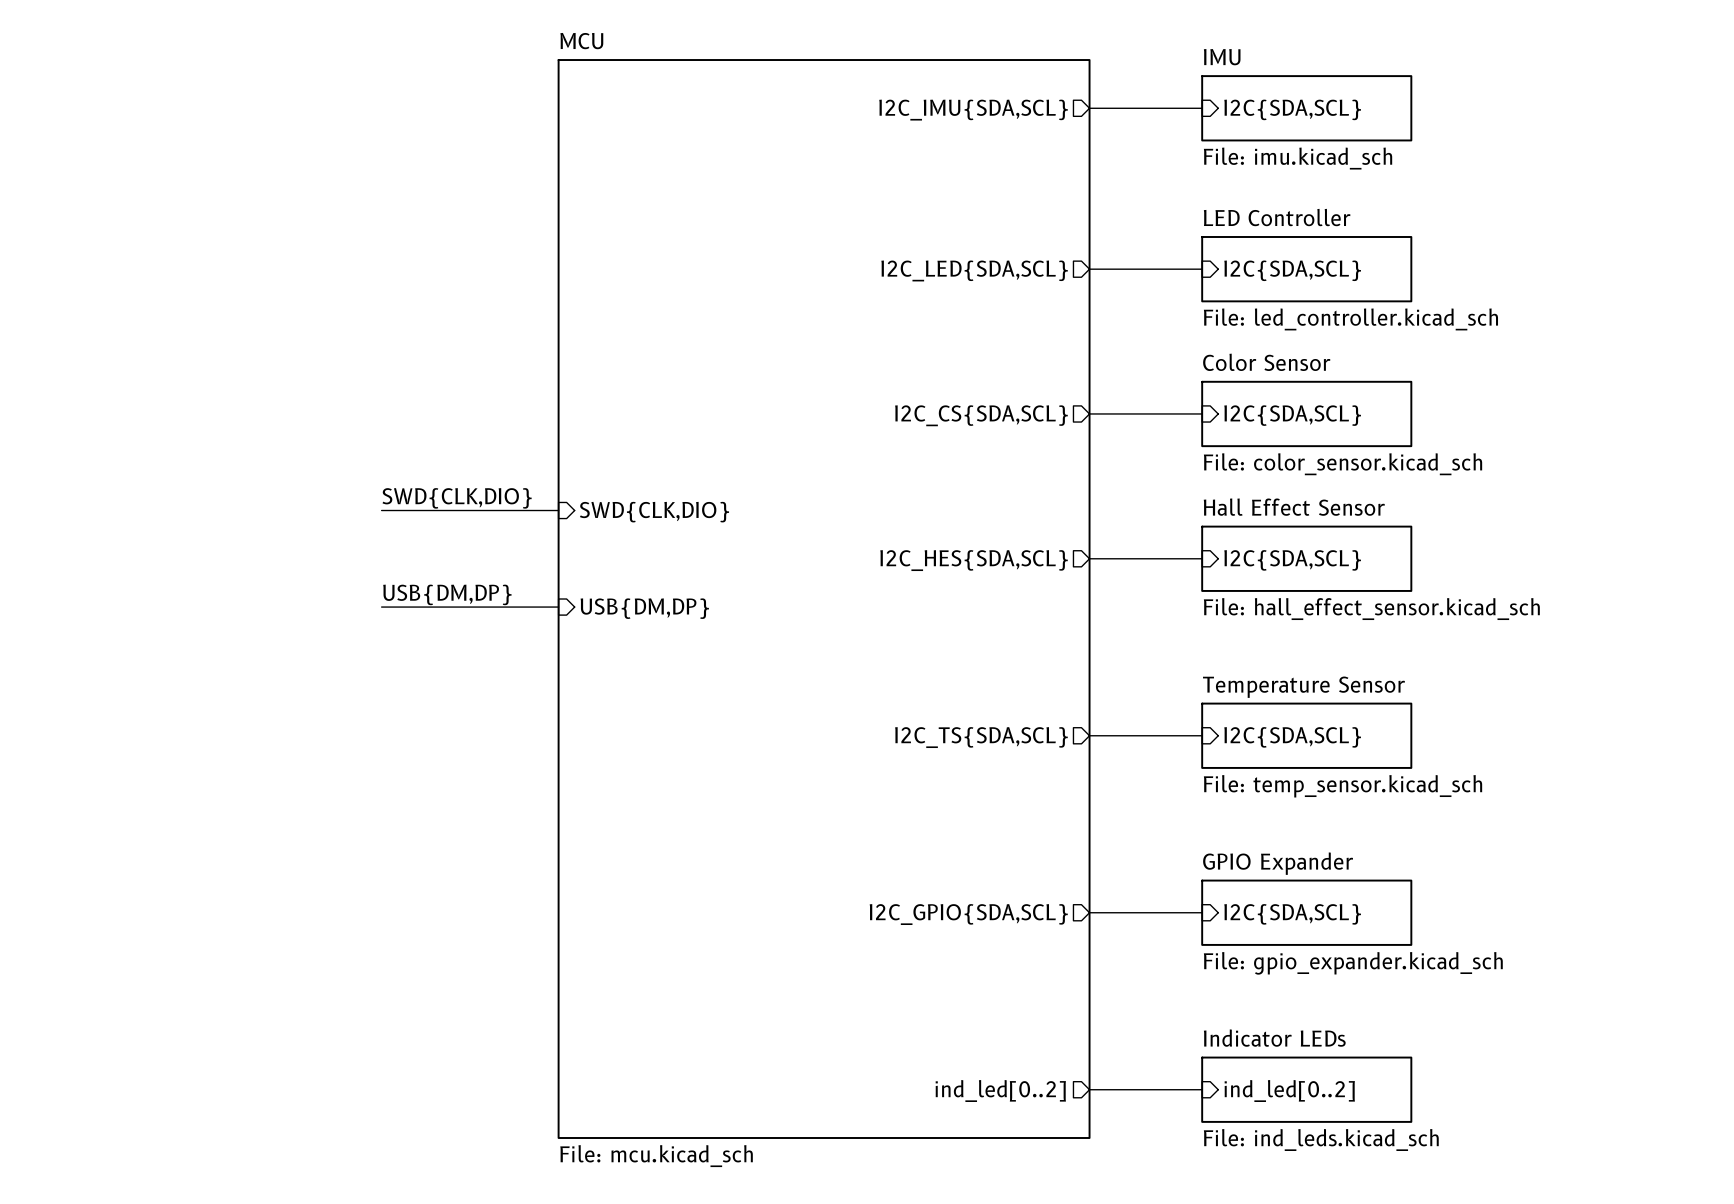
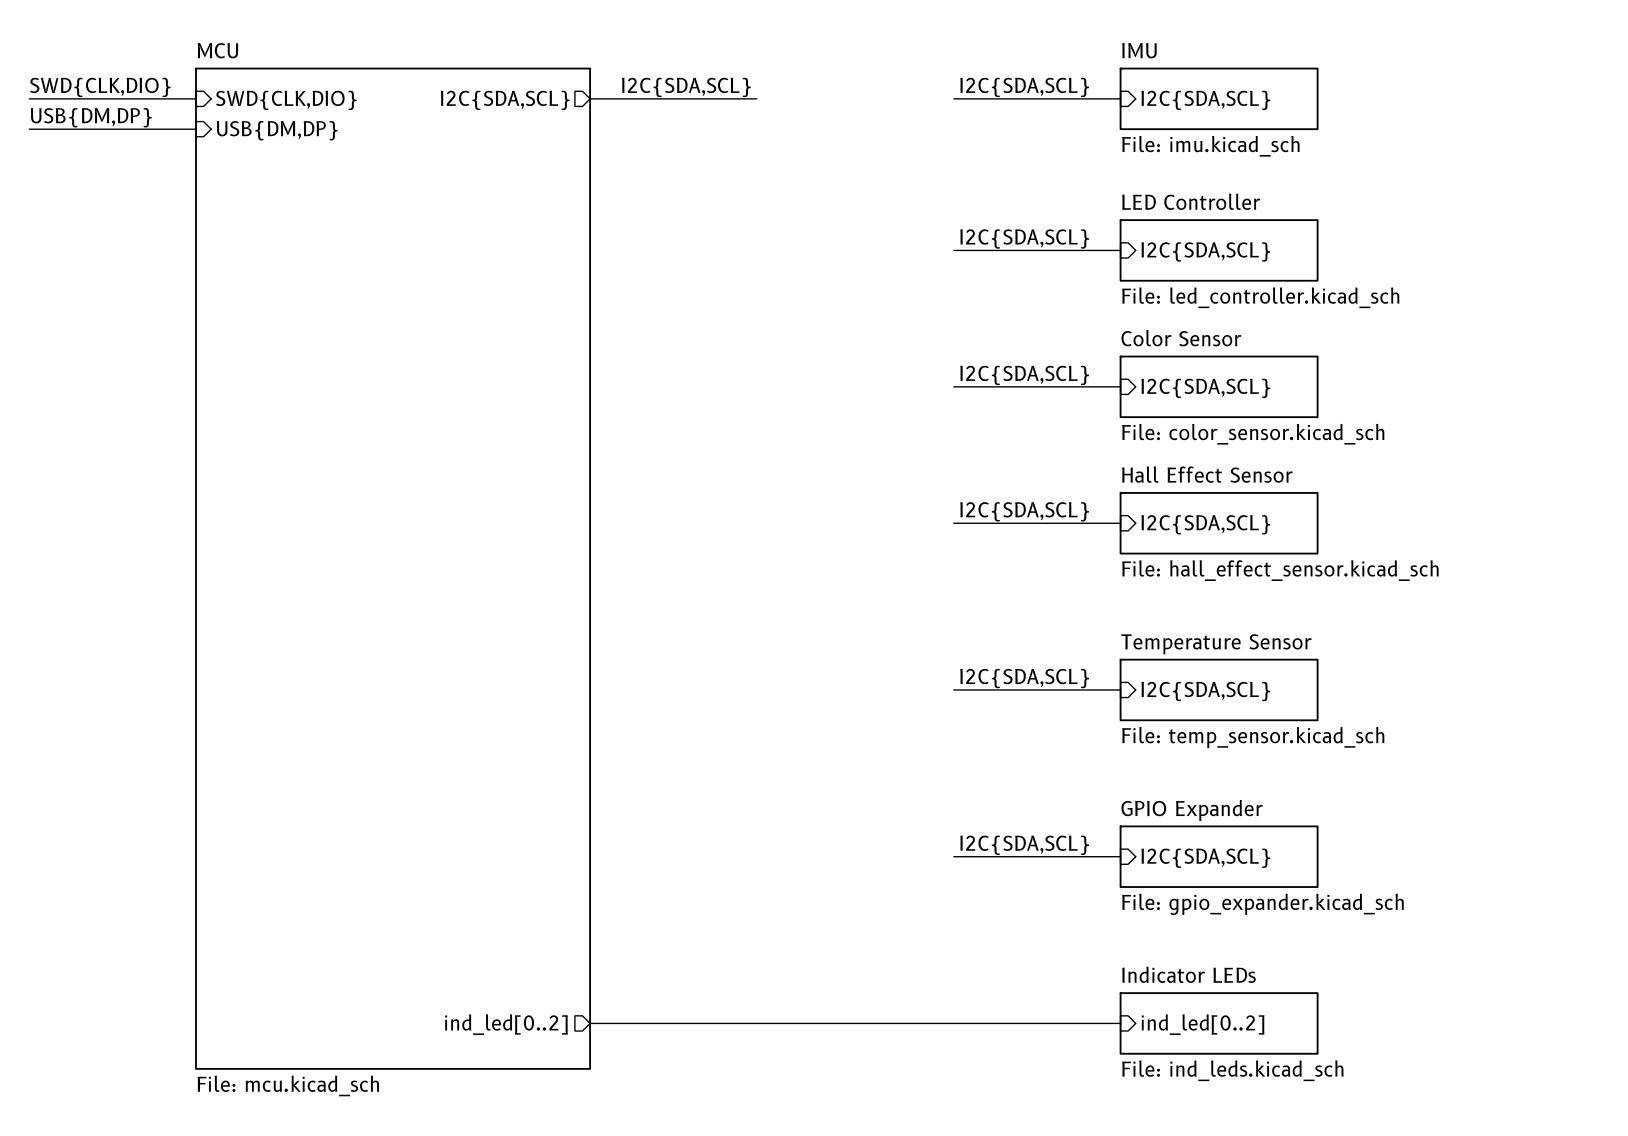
label: none -> SWD{CLK,DIO} (100, 87)
label: none -> I2C{SDA,SCL} (686, 87)
label: none -> I2C{SDA,SCL} (1024, 87)
bus: none -> (29, 98) (196, 98)
bus: none -> (590, 98) (756, 98)
bus: none -> (953, 98) (1014, 98)
sheet pin: none -> SWD{CLK,DIO} (286, 100)
sheet pin: none -> I2C{SDA,SCL} (505, 100)
sheet pin: I2C_IMU{SDA,SCL} (973, 110) -> none
label: none -> USB{DM,DP} (91, 117)
bus: none -> (29, 129) (196, 129)
sheet pin: none -> USB{DM,DP} (277, 130)
label: none -> I2C{SDA,SCL} (1024, 239)
bus: none -> (953, 250) (1014, 250)
sheet pin: I2C_LED{SDA,SCL} (974, 270) -> none
label: none -> I2C{SDA,SCL} (1024, 375)
bus: none -> (953, 386) (1014, 386)
sheet pin: I2C_CS{SDA,SCL} (981, 415) -> none
label: SWD{CLK,DIO} (457, 498) -> none
bus: (381, 510) (558, 510) -> none
sheet pin: SWD{CLK,DIO} (654, 512) -> none
label: none -> I2C{SDA,SCL} (1024, 511)
bus: none -> (953, 523) (1014, 523)
sheet pin: I2C_HES{SDA,SCL} (974, 560) -> none
label: USB{DM,DP} (447, 594) -> none
sheet MCU: File: mcu.kicad_sch (824, 599) -> none
bus: (381, 607) (558, 607) -> none
sheet MCU: none -> File: mcu.kicad_sch (393, 568)
sheet pin: USB{DM,DP} (644, 608) -> none
label: none -> I2C{SDA,SCL} (1024, 678)
bus: none -> (953, 689) (1014, 689)
sheet pin: I2C_TS{SDA,SCL} (981, 737) -> none
label: none -> I2C{SDA,SCL} (1024, 845)
bus: none -> (953, 856) (1014, 856)
sheet pin: I2C_GPIO{SDA,SCL} (968, 914) -> none
bus: none -> (590, 1023) (1014, 1023)
sheet pin: none -> ind_led[0..2] (506, 1024)
sheet pin: ind_led[0..2] (1000, 1091) -> none

